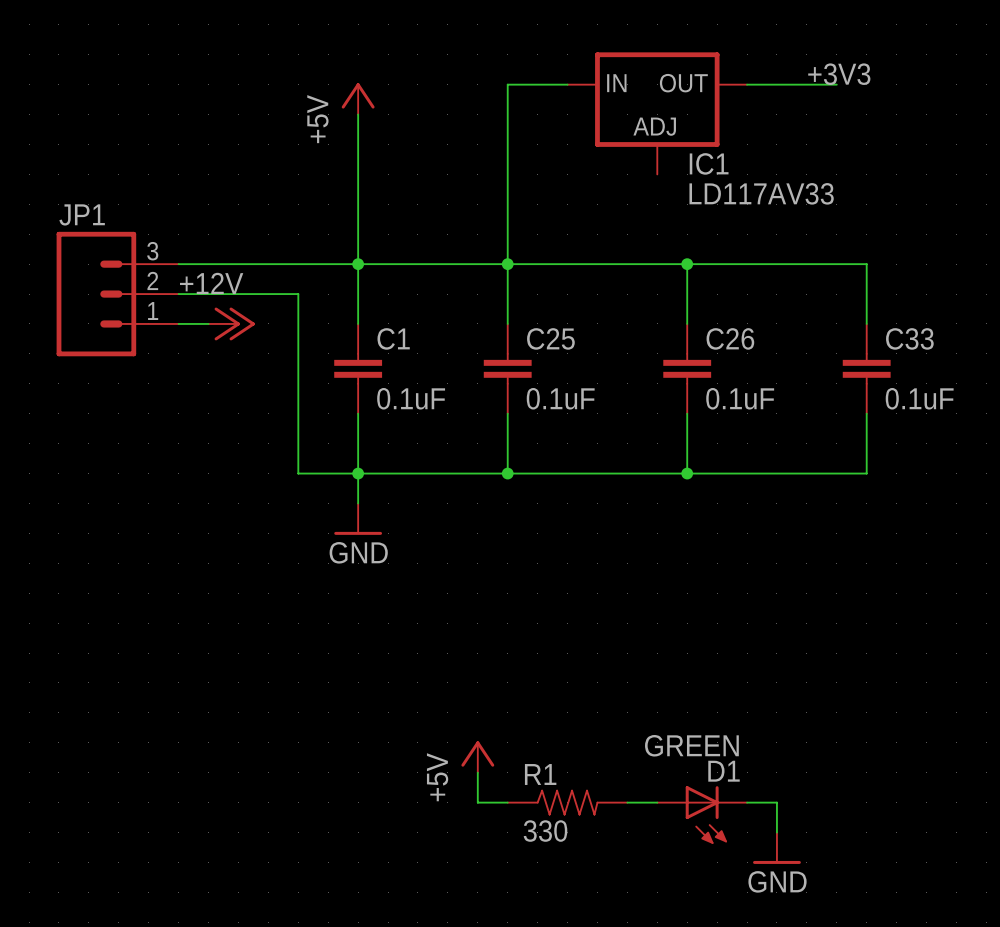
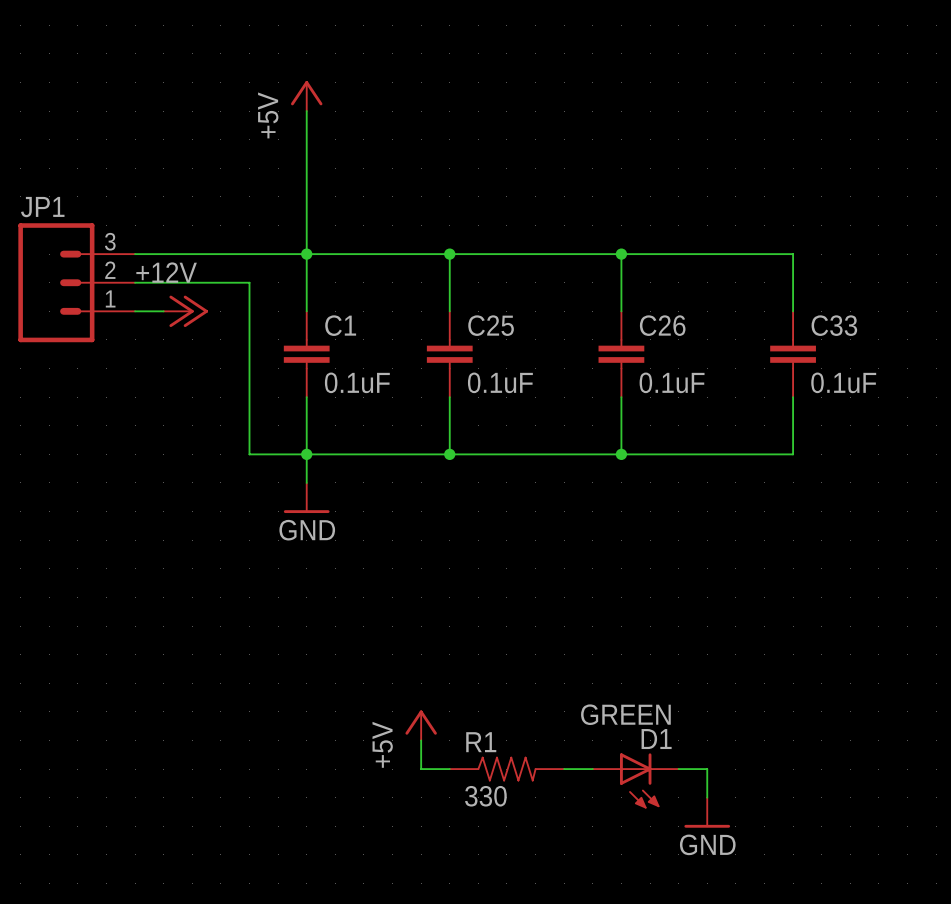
label: +3V3 (839, 74) -> none
wire: (567, 84) (507, 84) (507, 264) -> none
wire: (747, 84) (836, 84) -> none
IC1: LD117AV33 (657, 113) -> none

